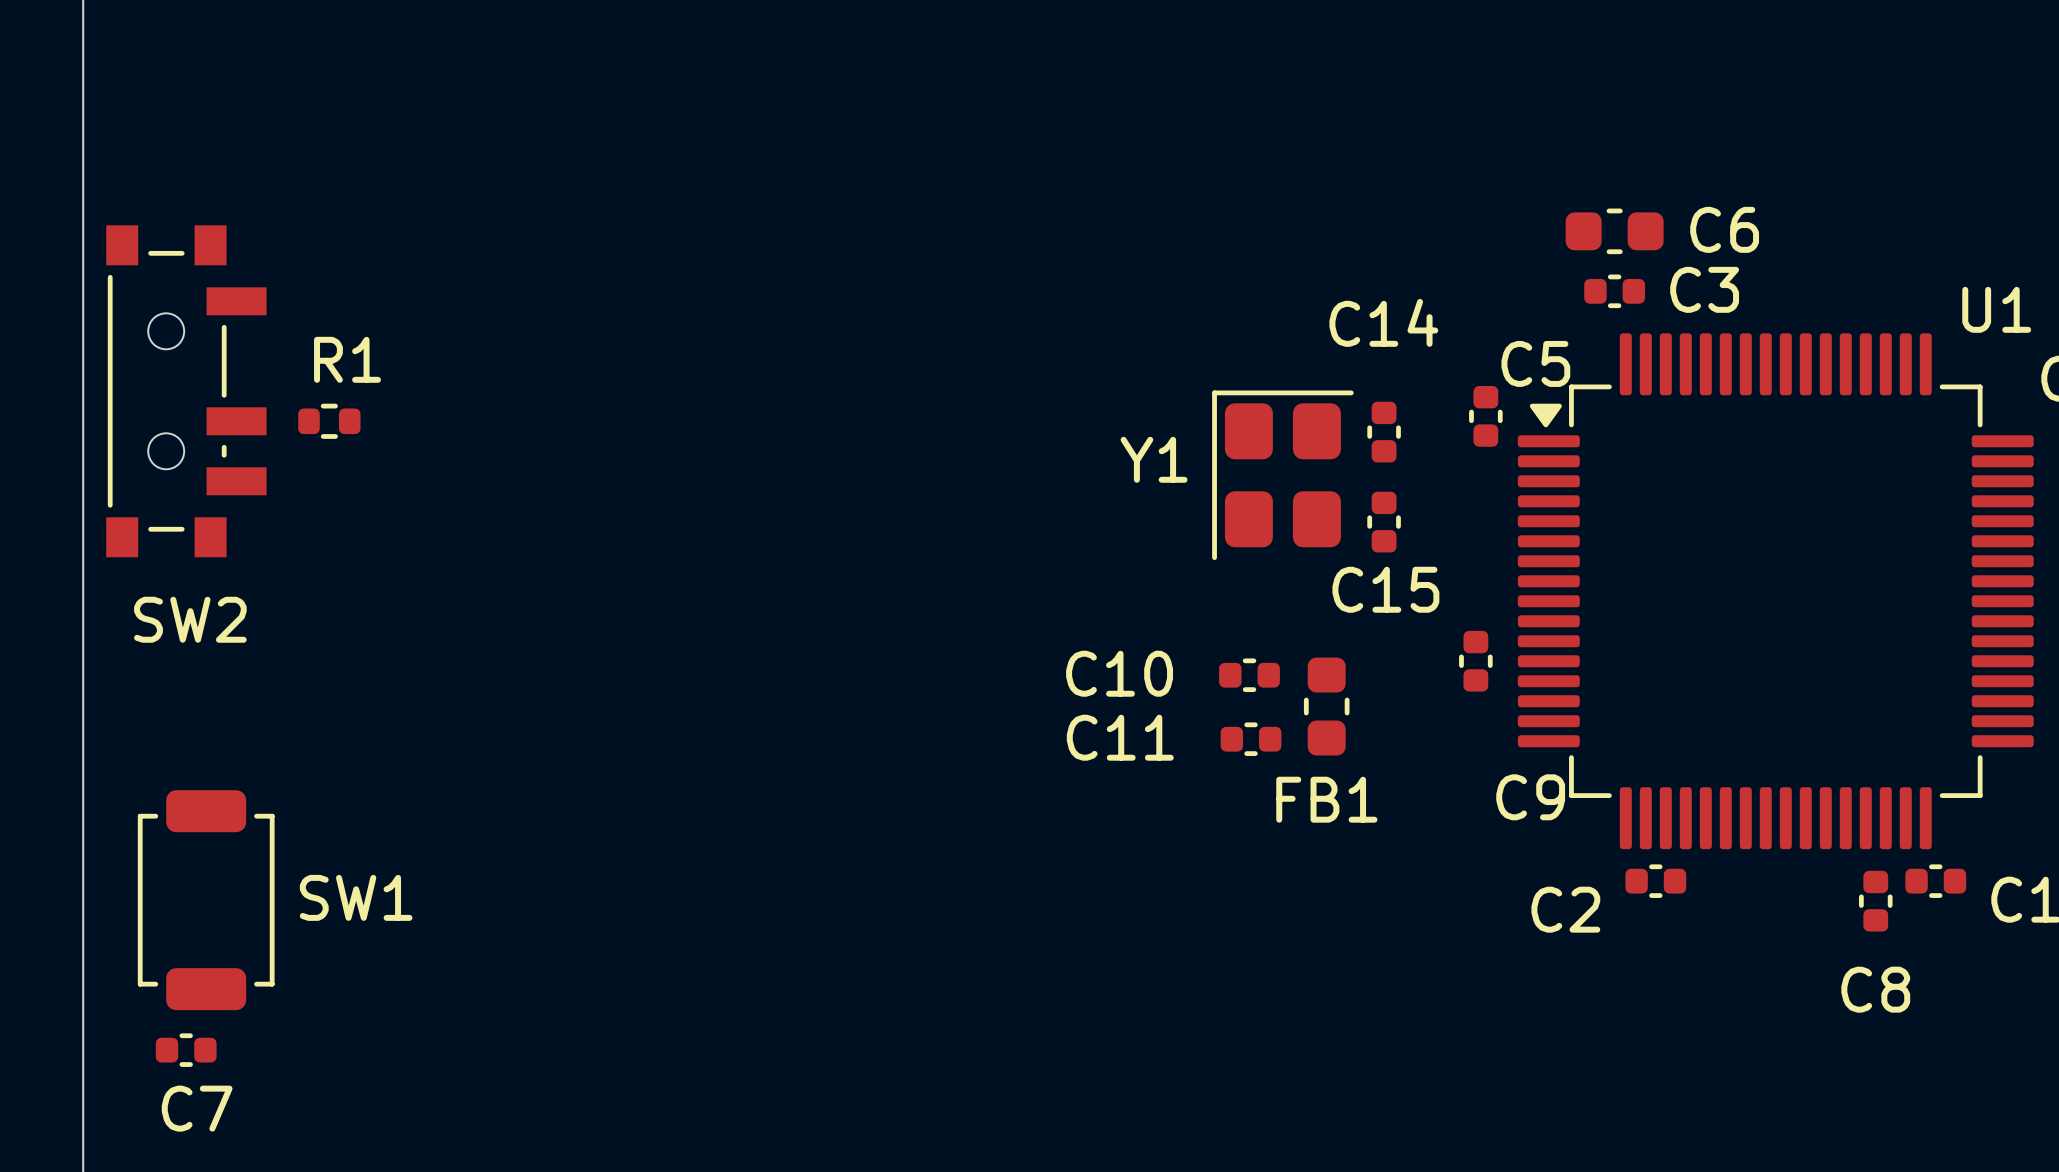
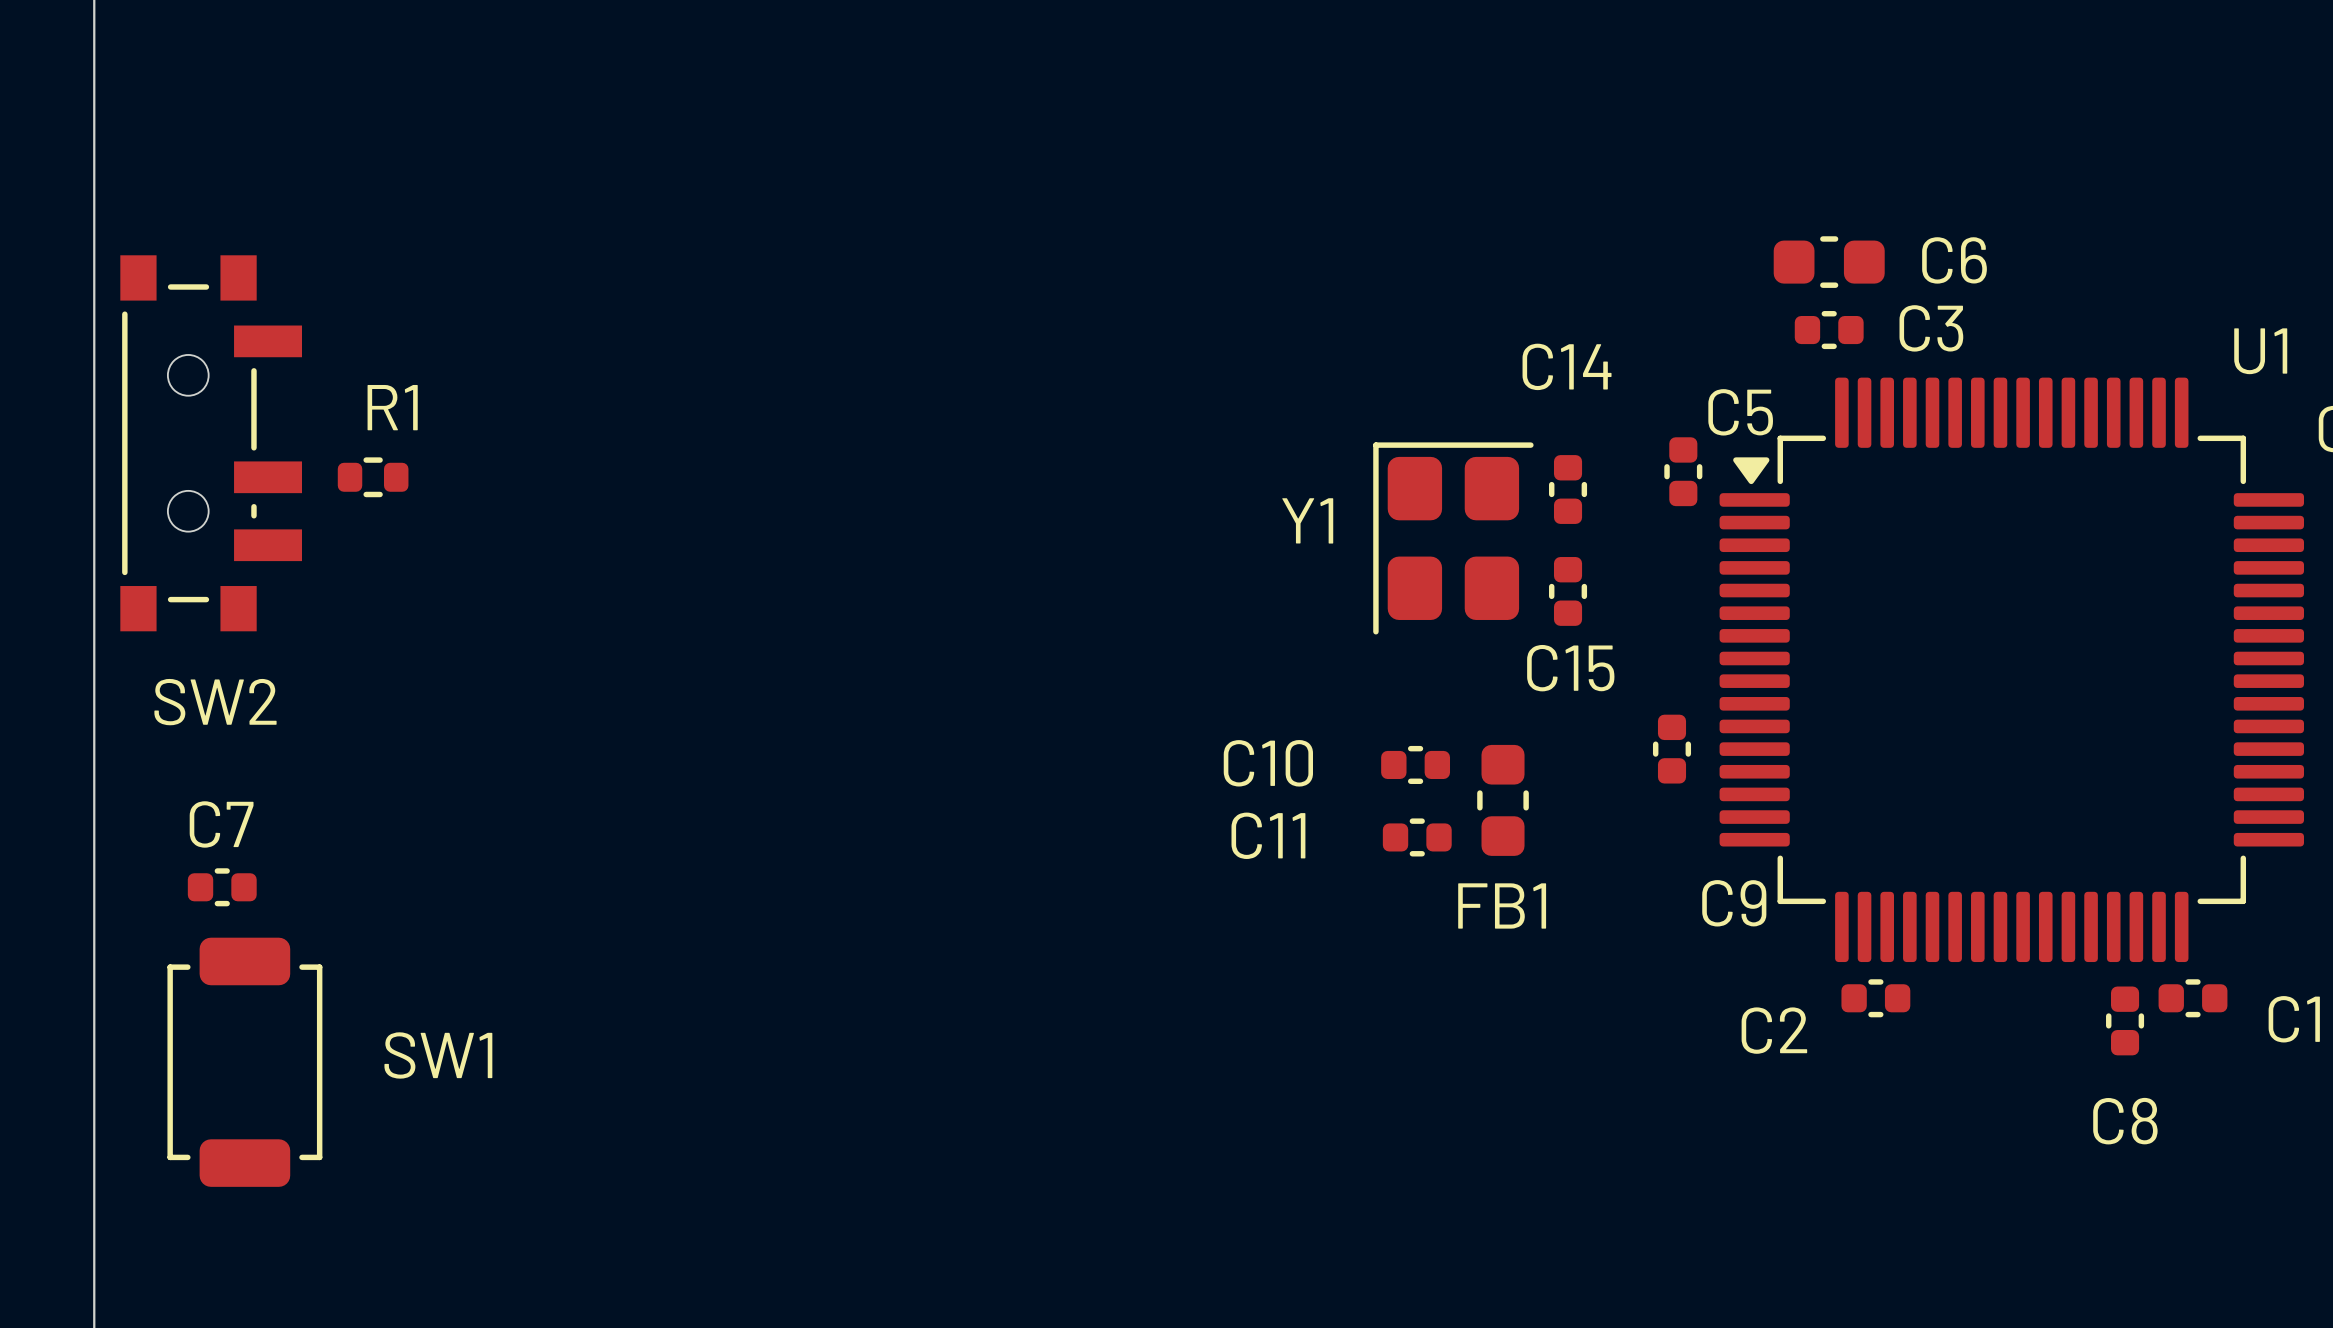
SW1 name position: SW1 (356, 897) -> SW1 (438, 1055)
SW1 position: (206, 900) -> (244, 1062)
C7 position: (186, 1050) -> (222, 887)
C7 name position: C7 (197, 1108) -> C7 (221, 824)

